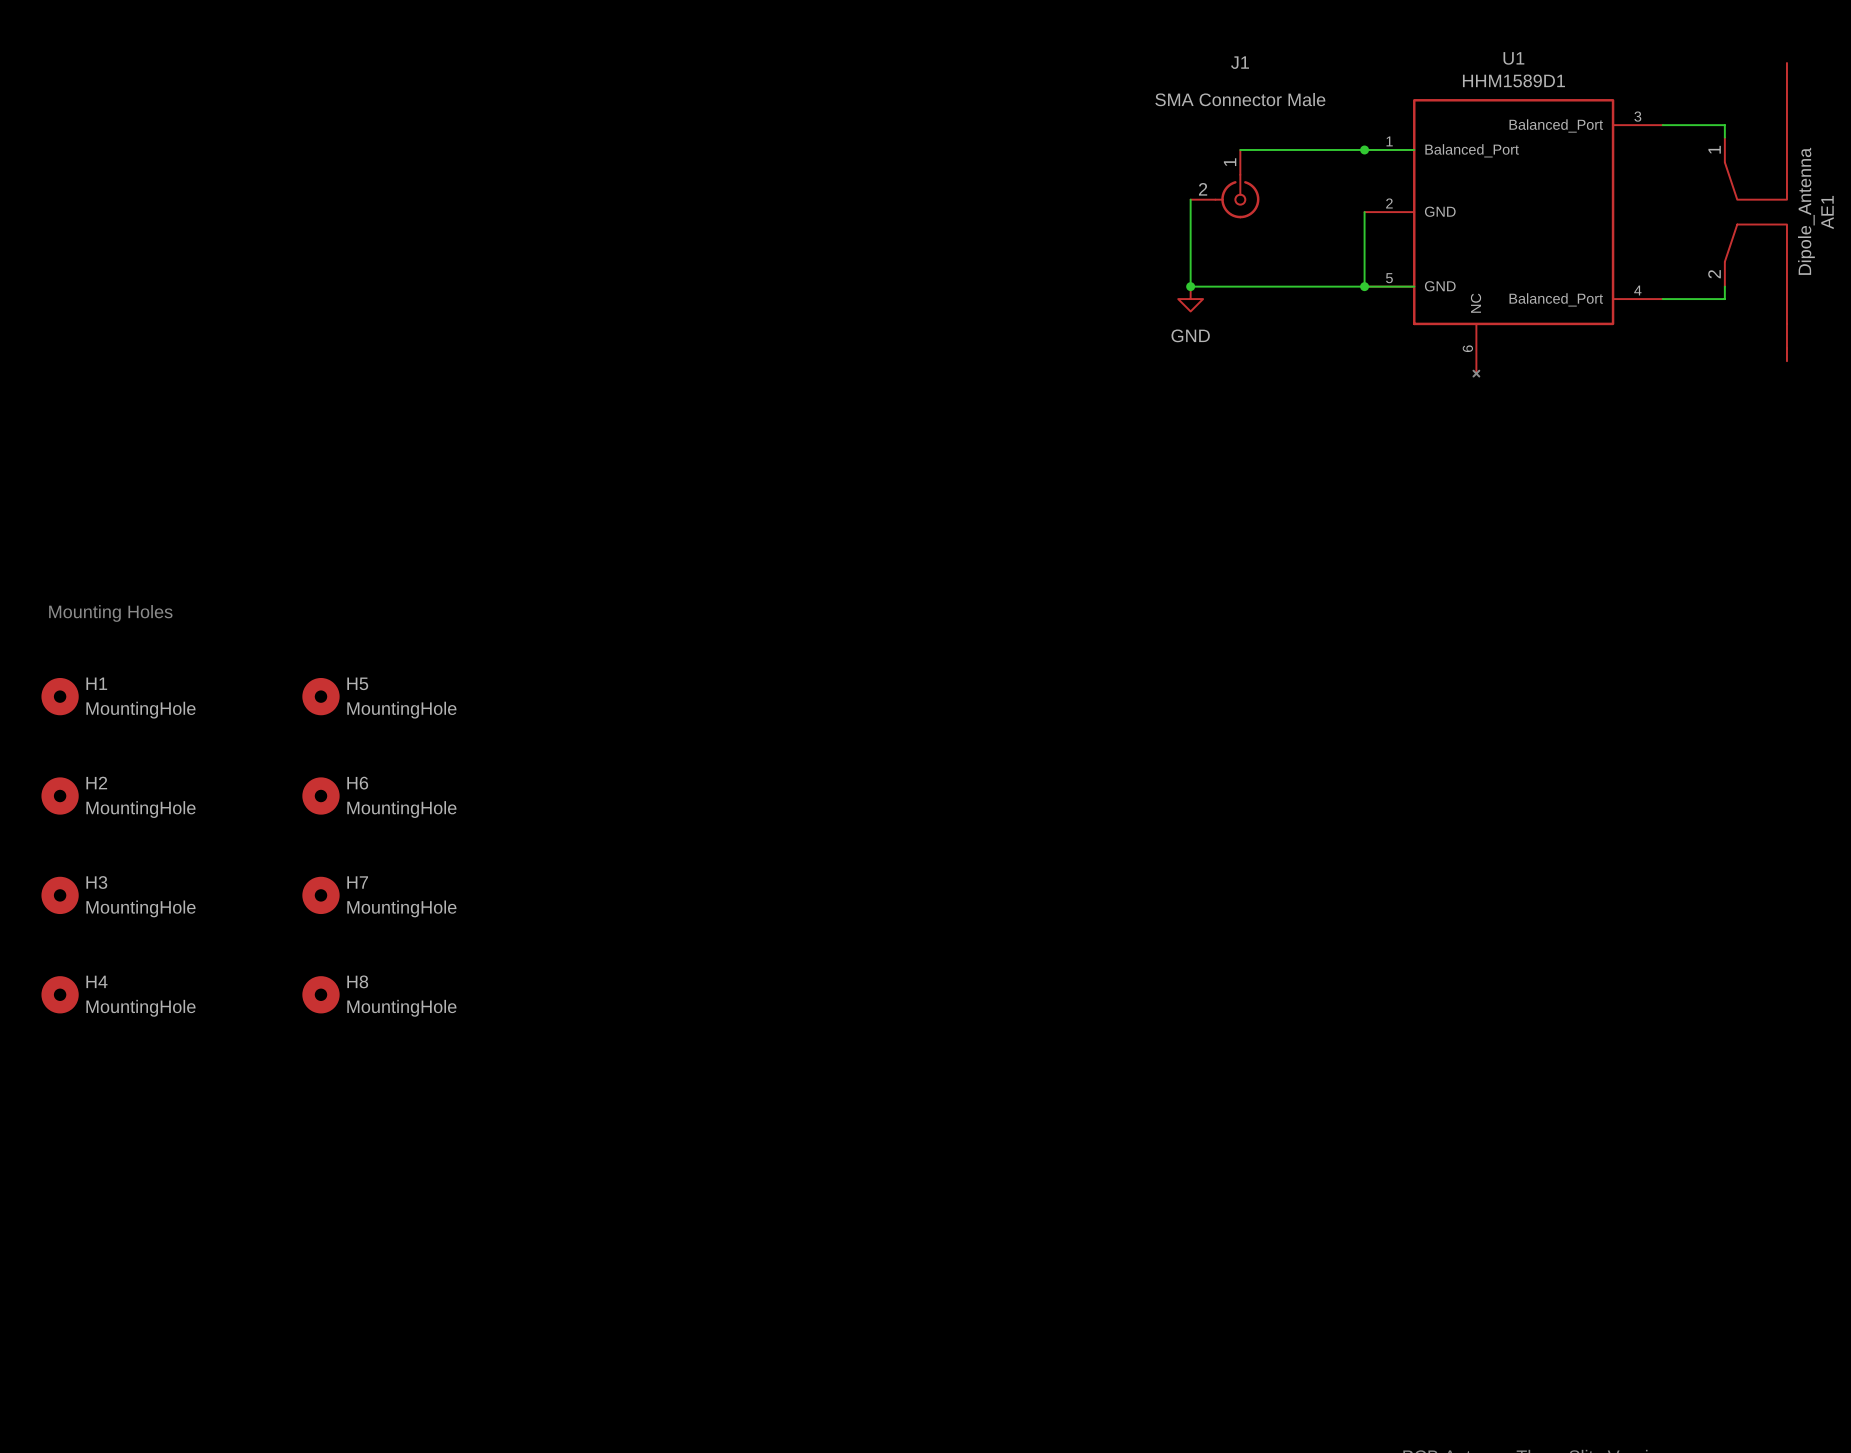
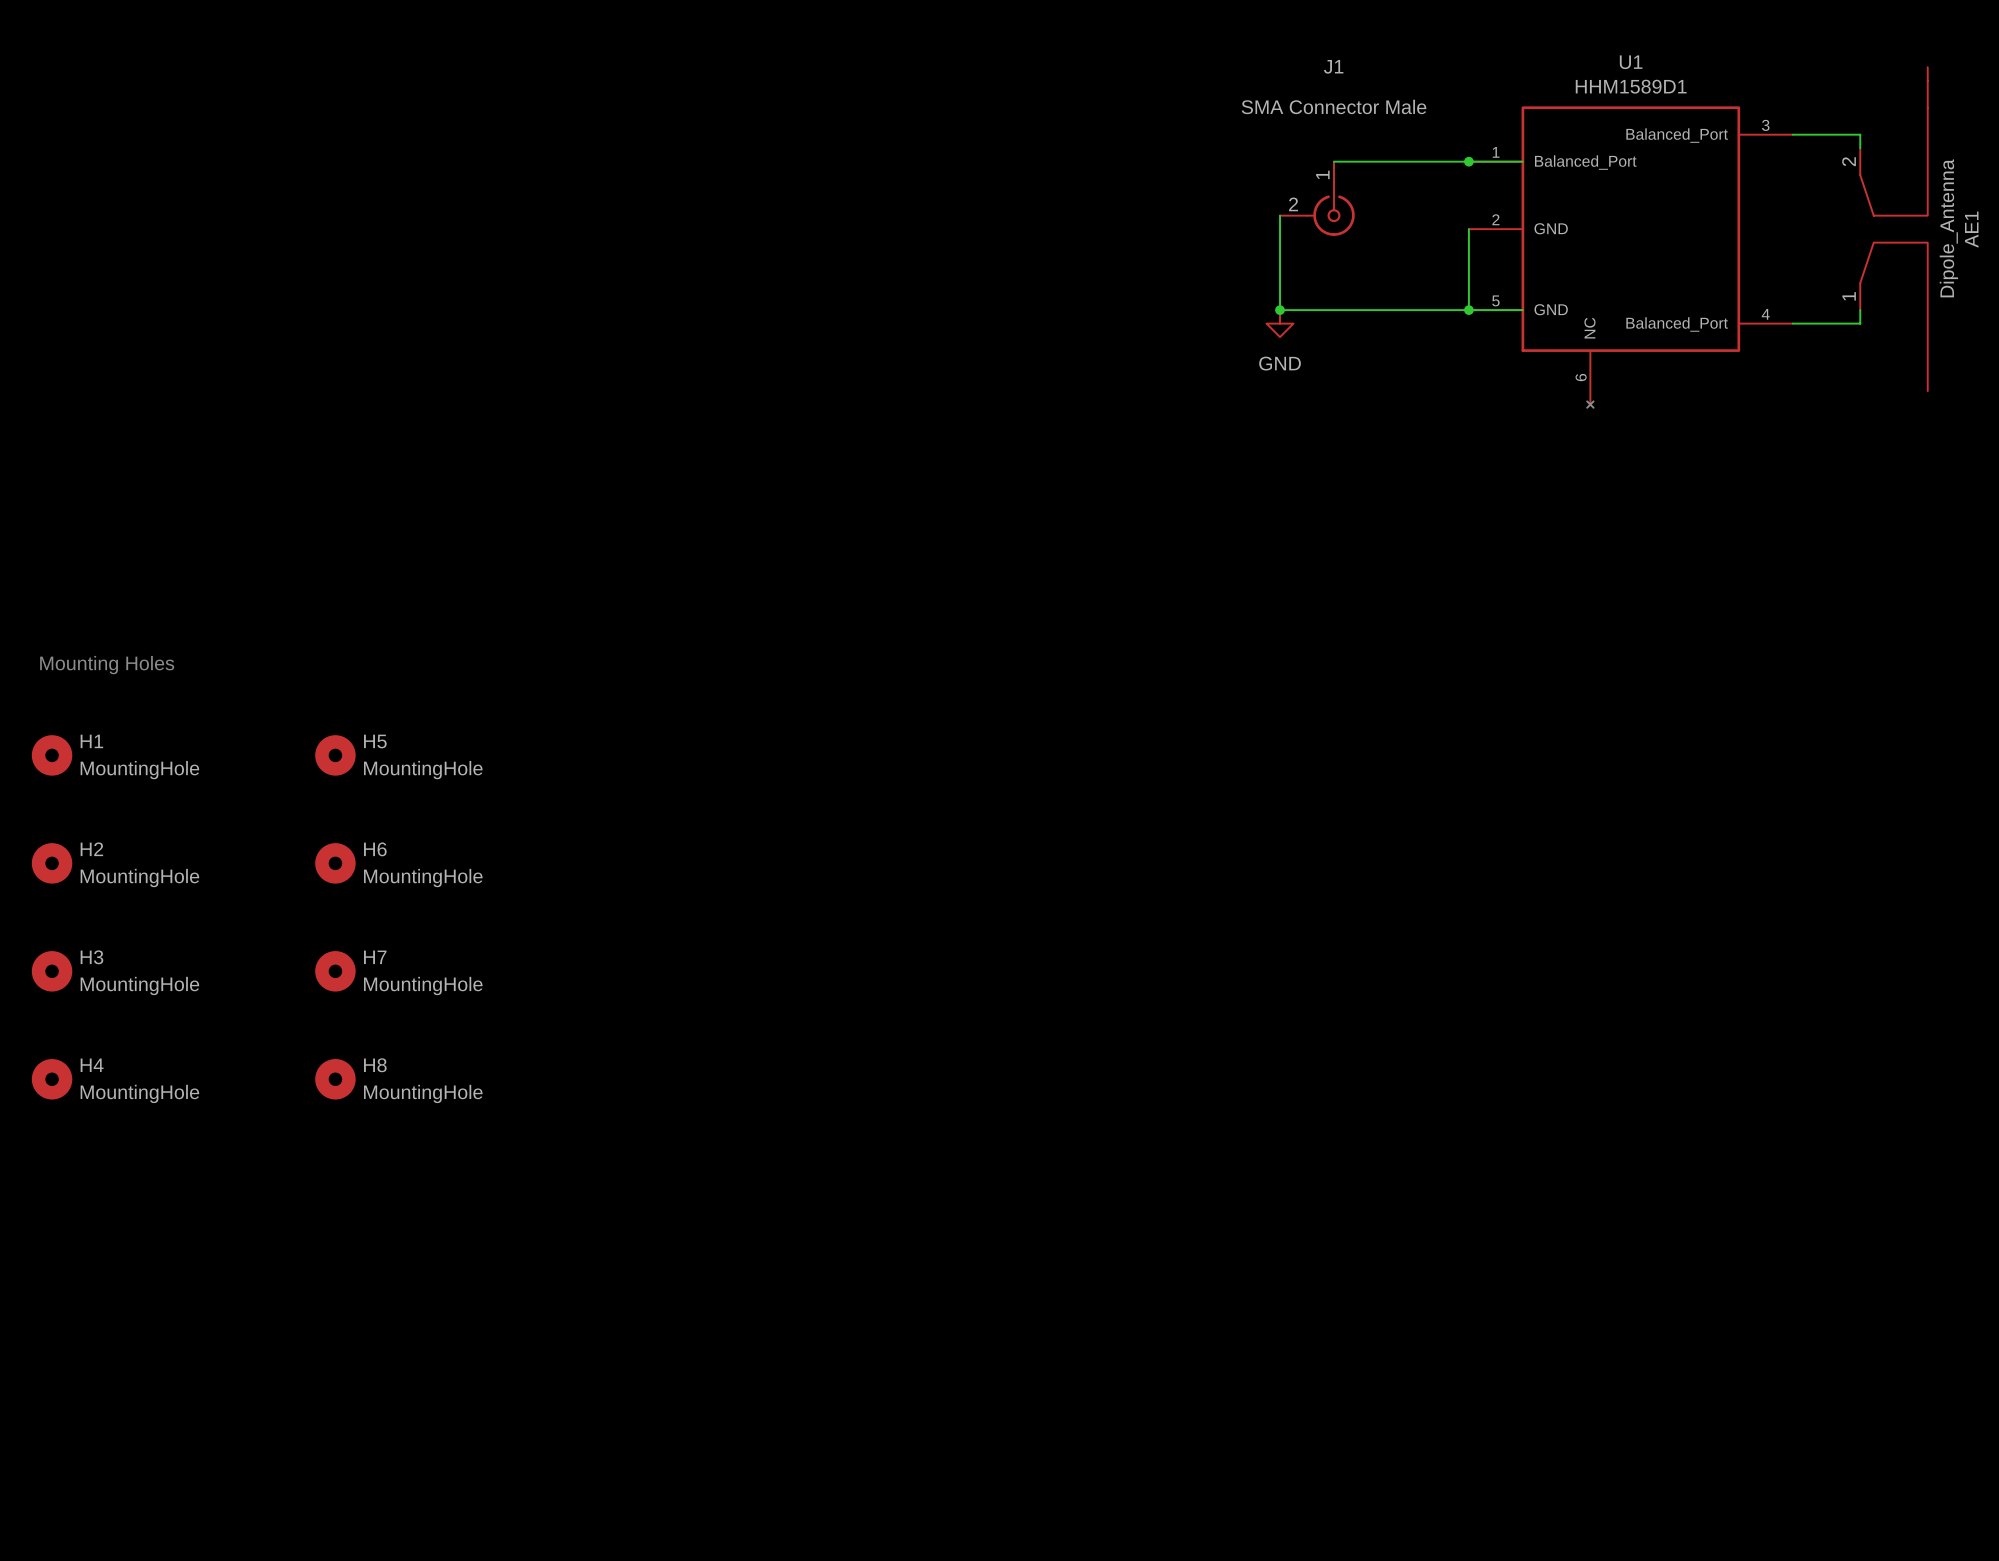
AE1 flip: as is (1755, 212) -> up-down (1893, 229)

